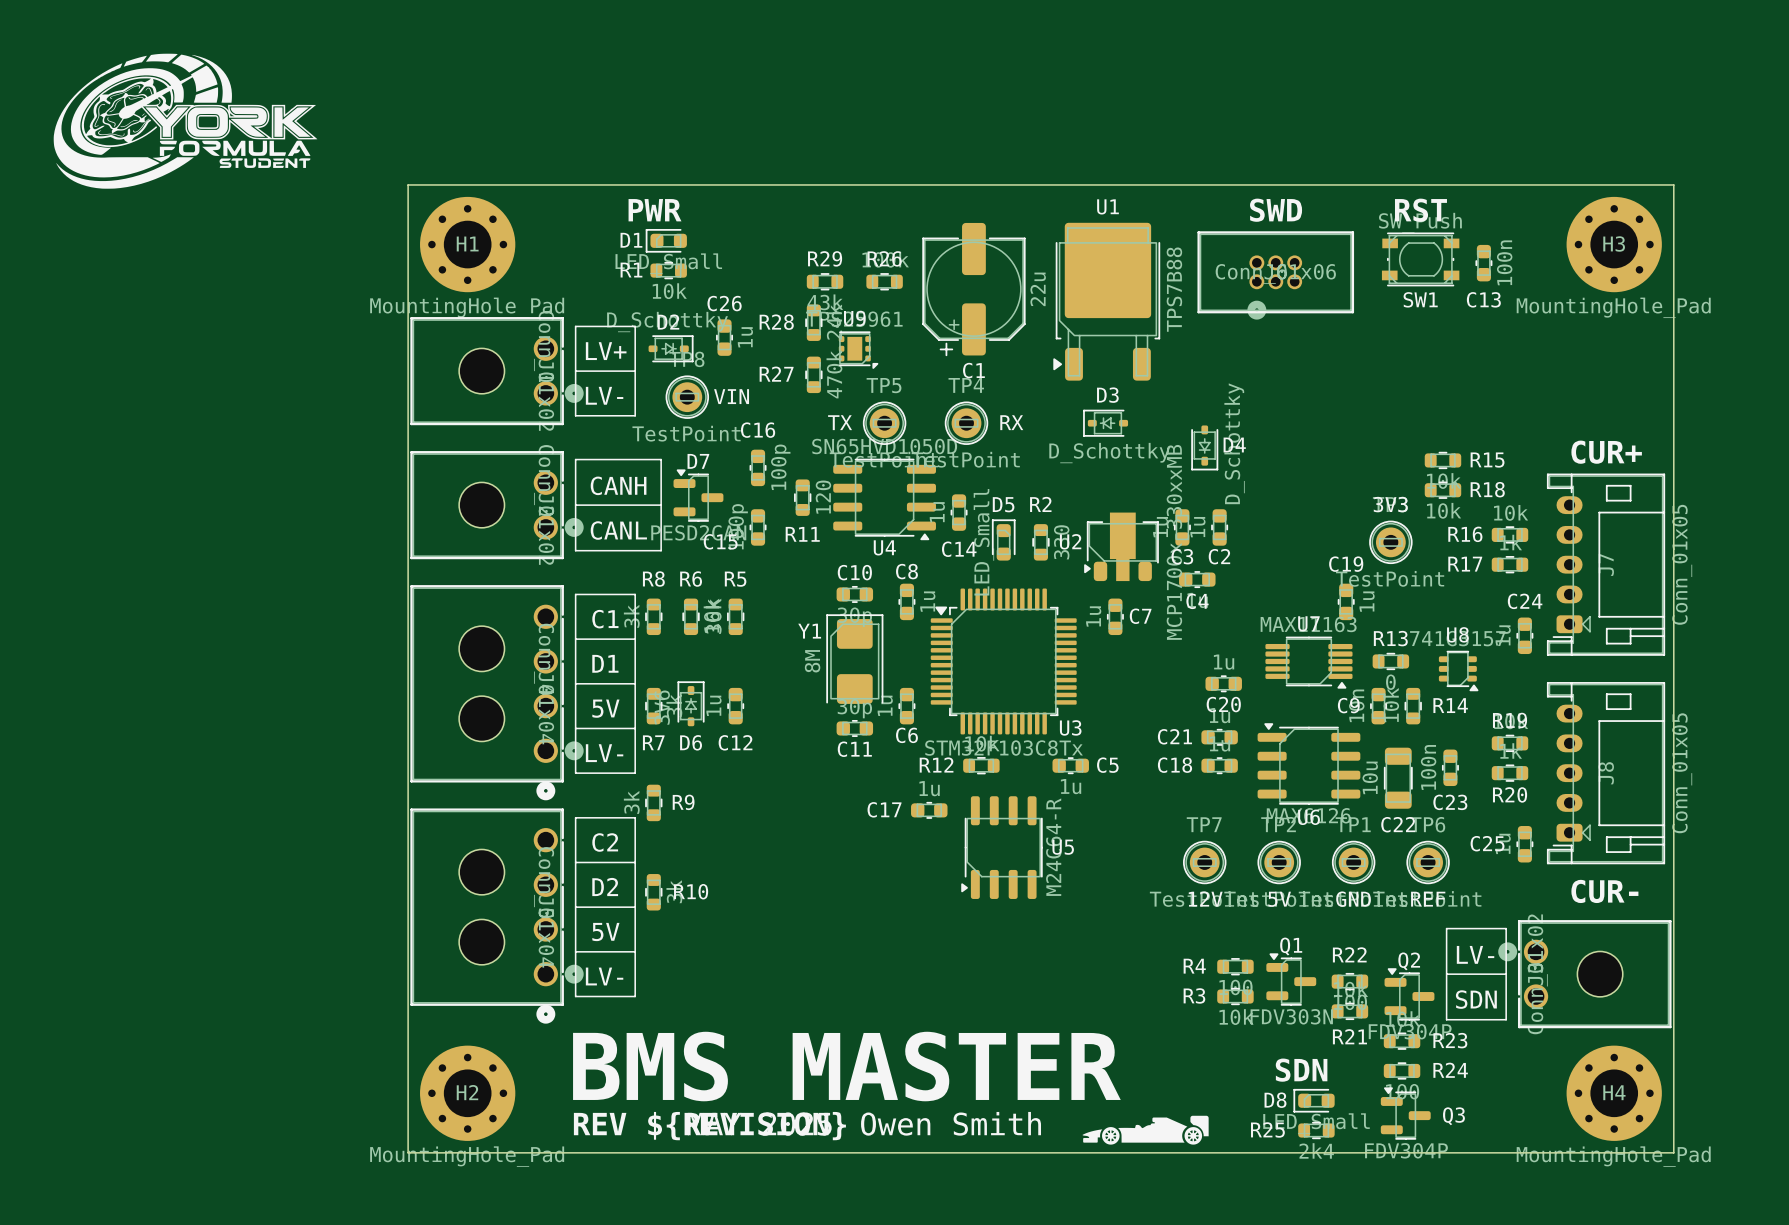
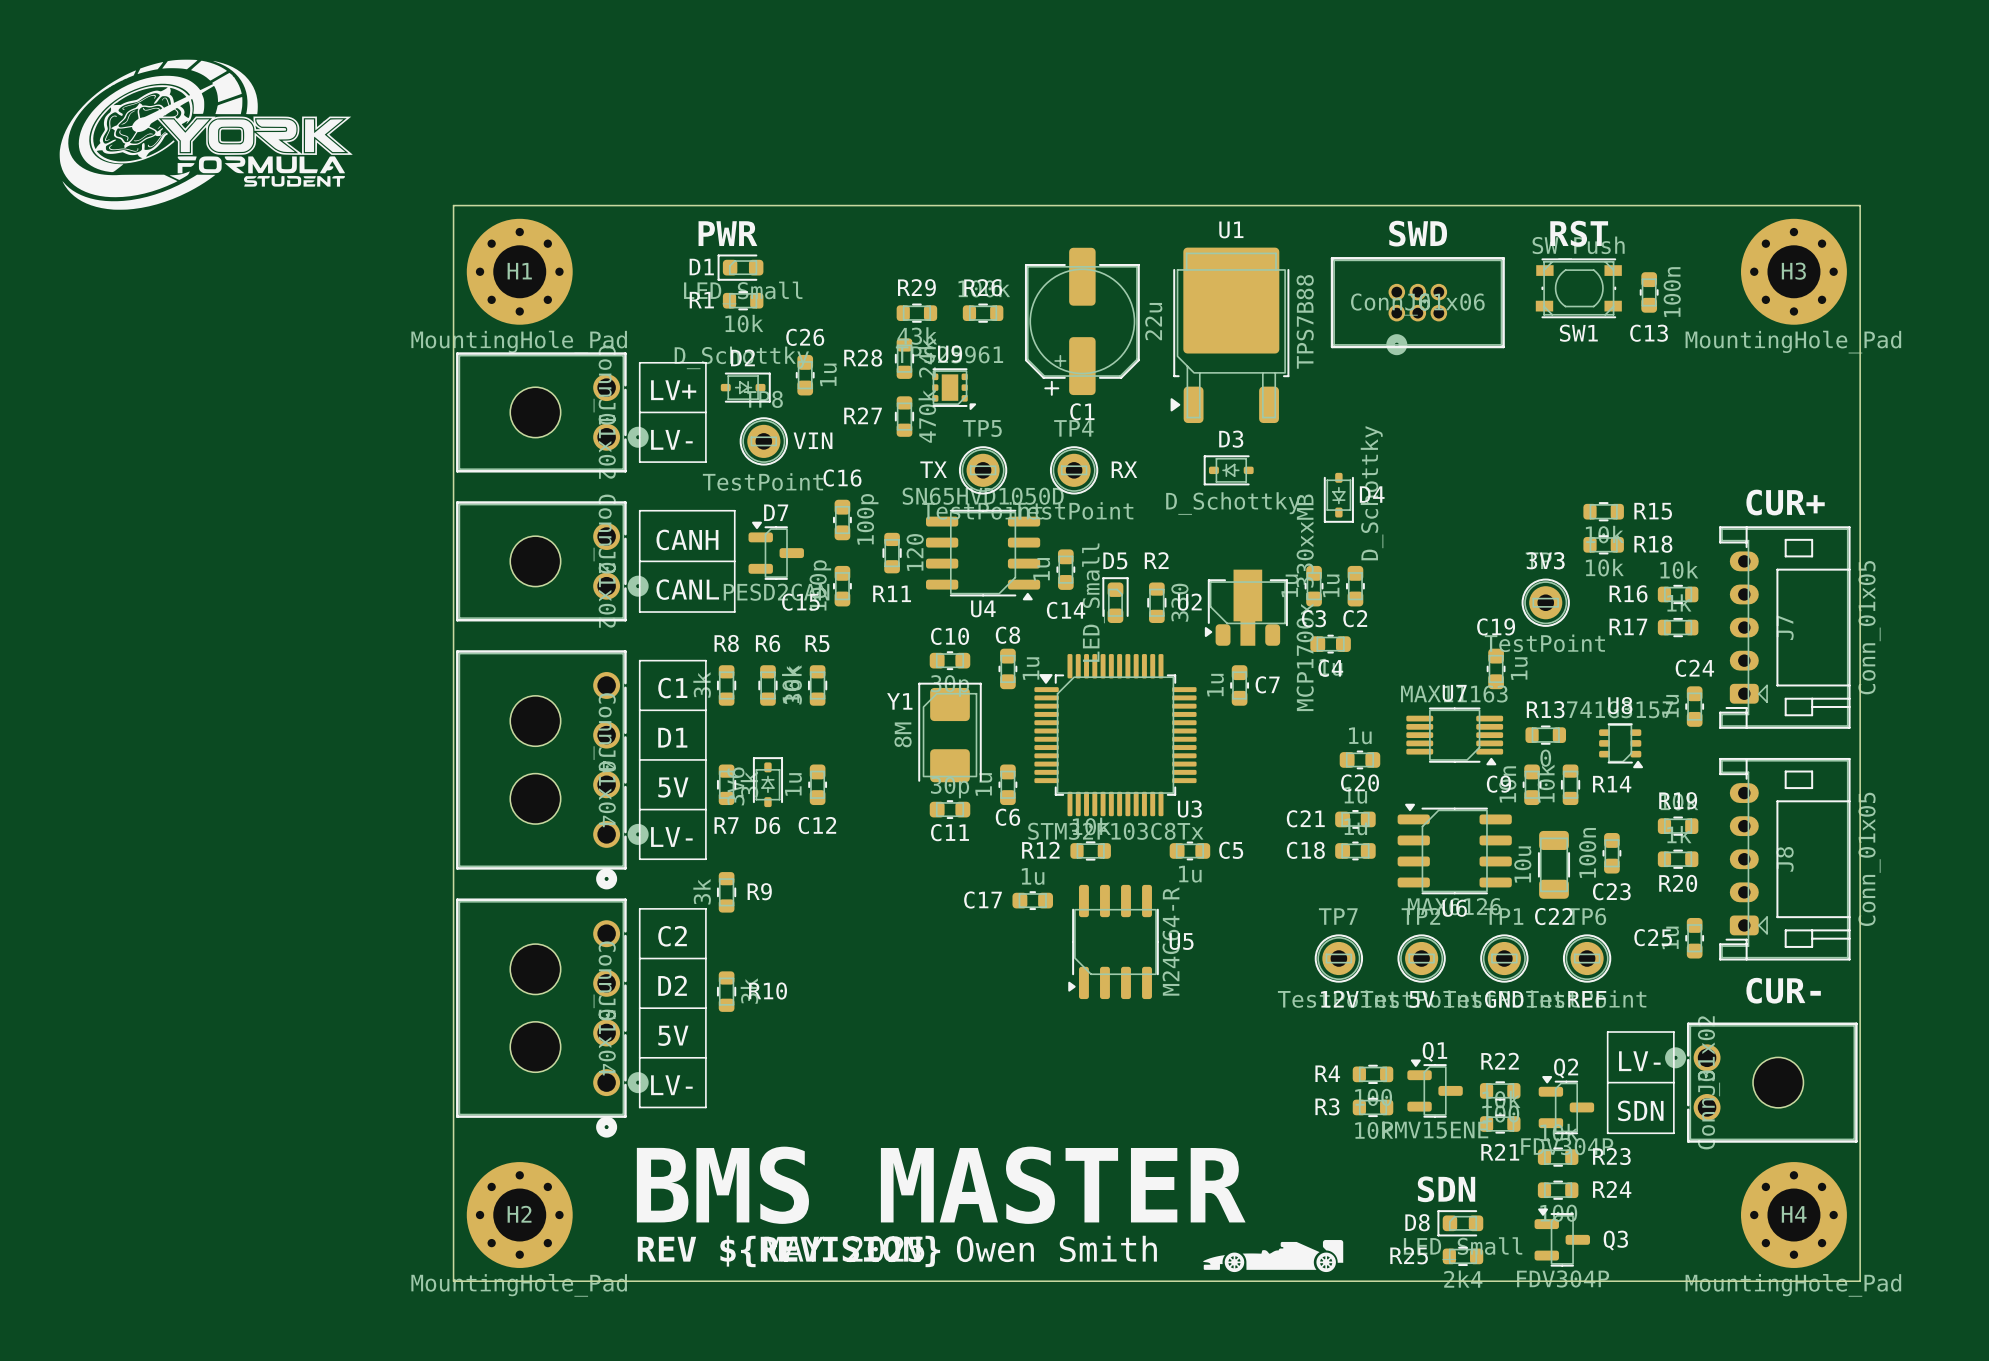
Q1 value: FDV303N (1291, 1016) -> PMV15ENE (1435, 1130)

